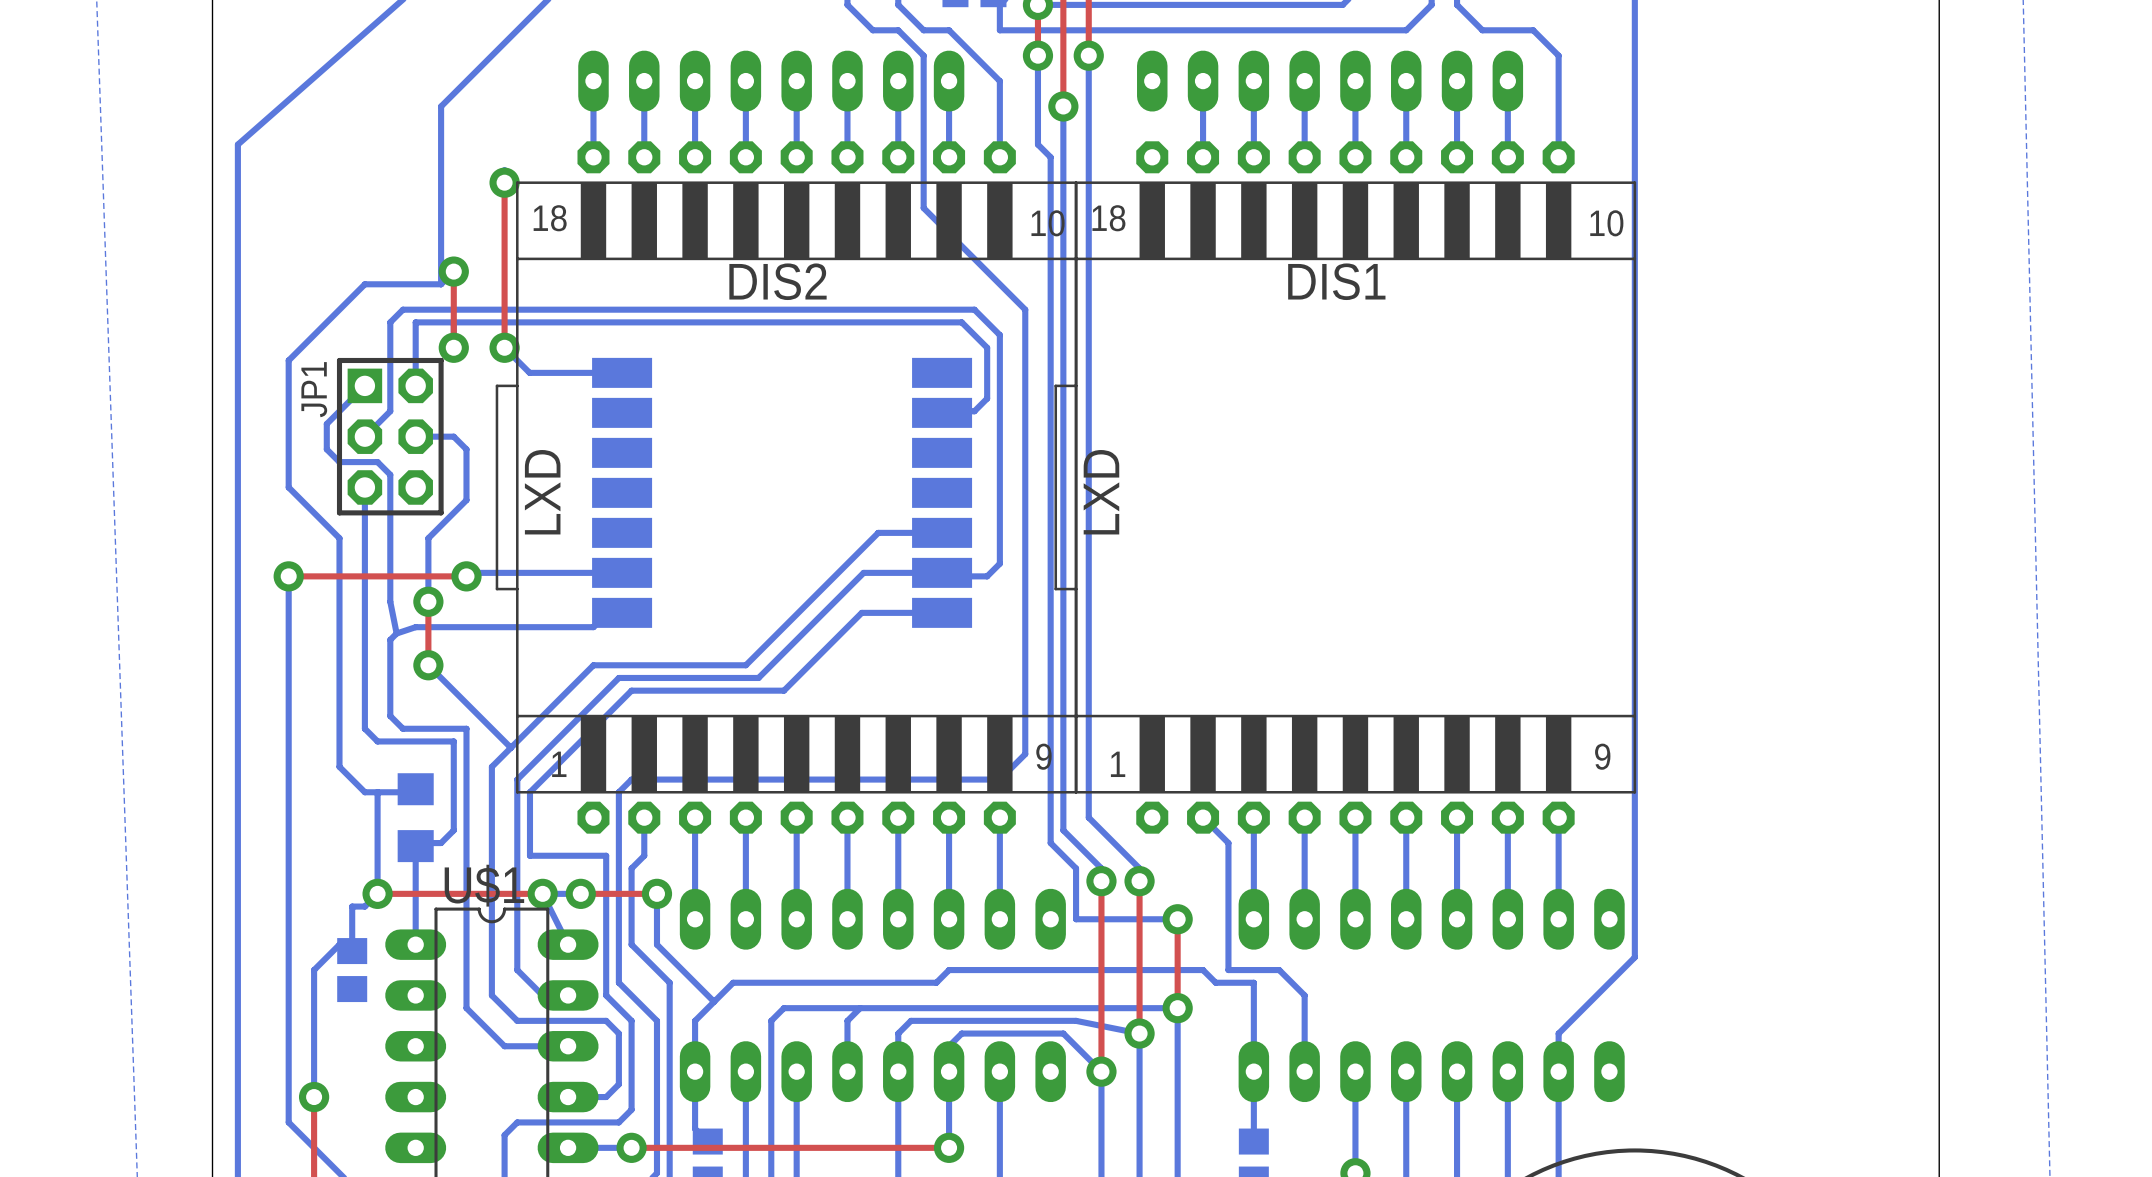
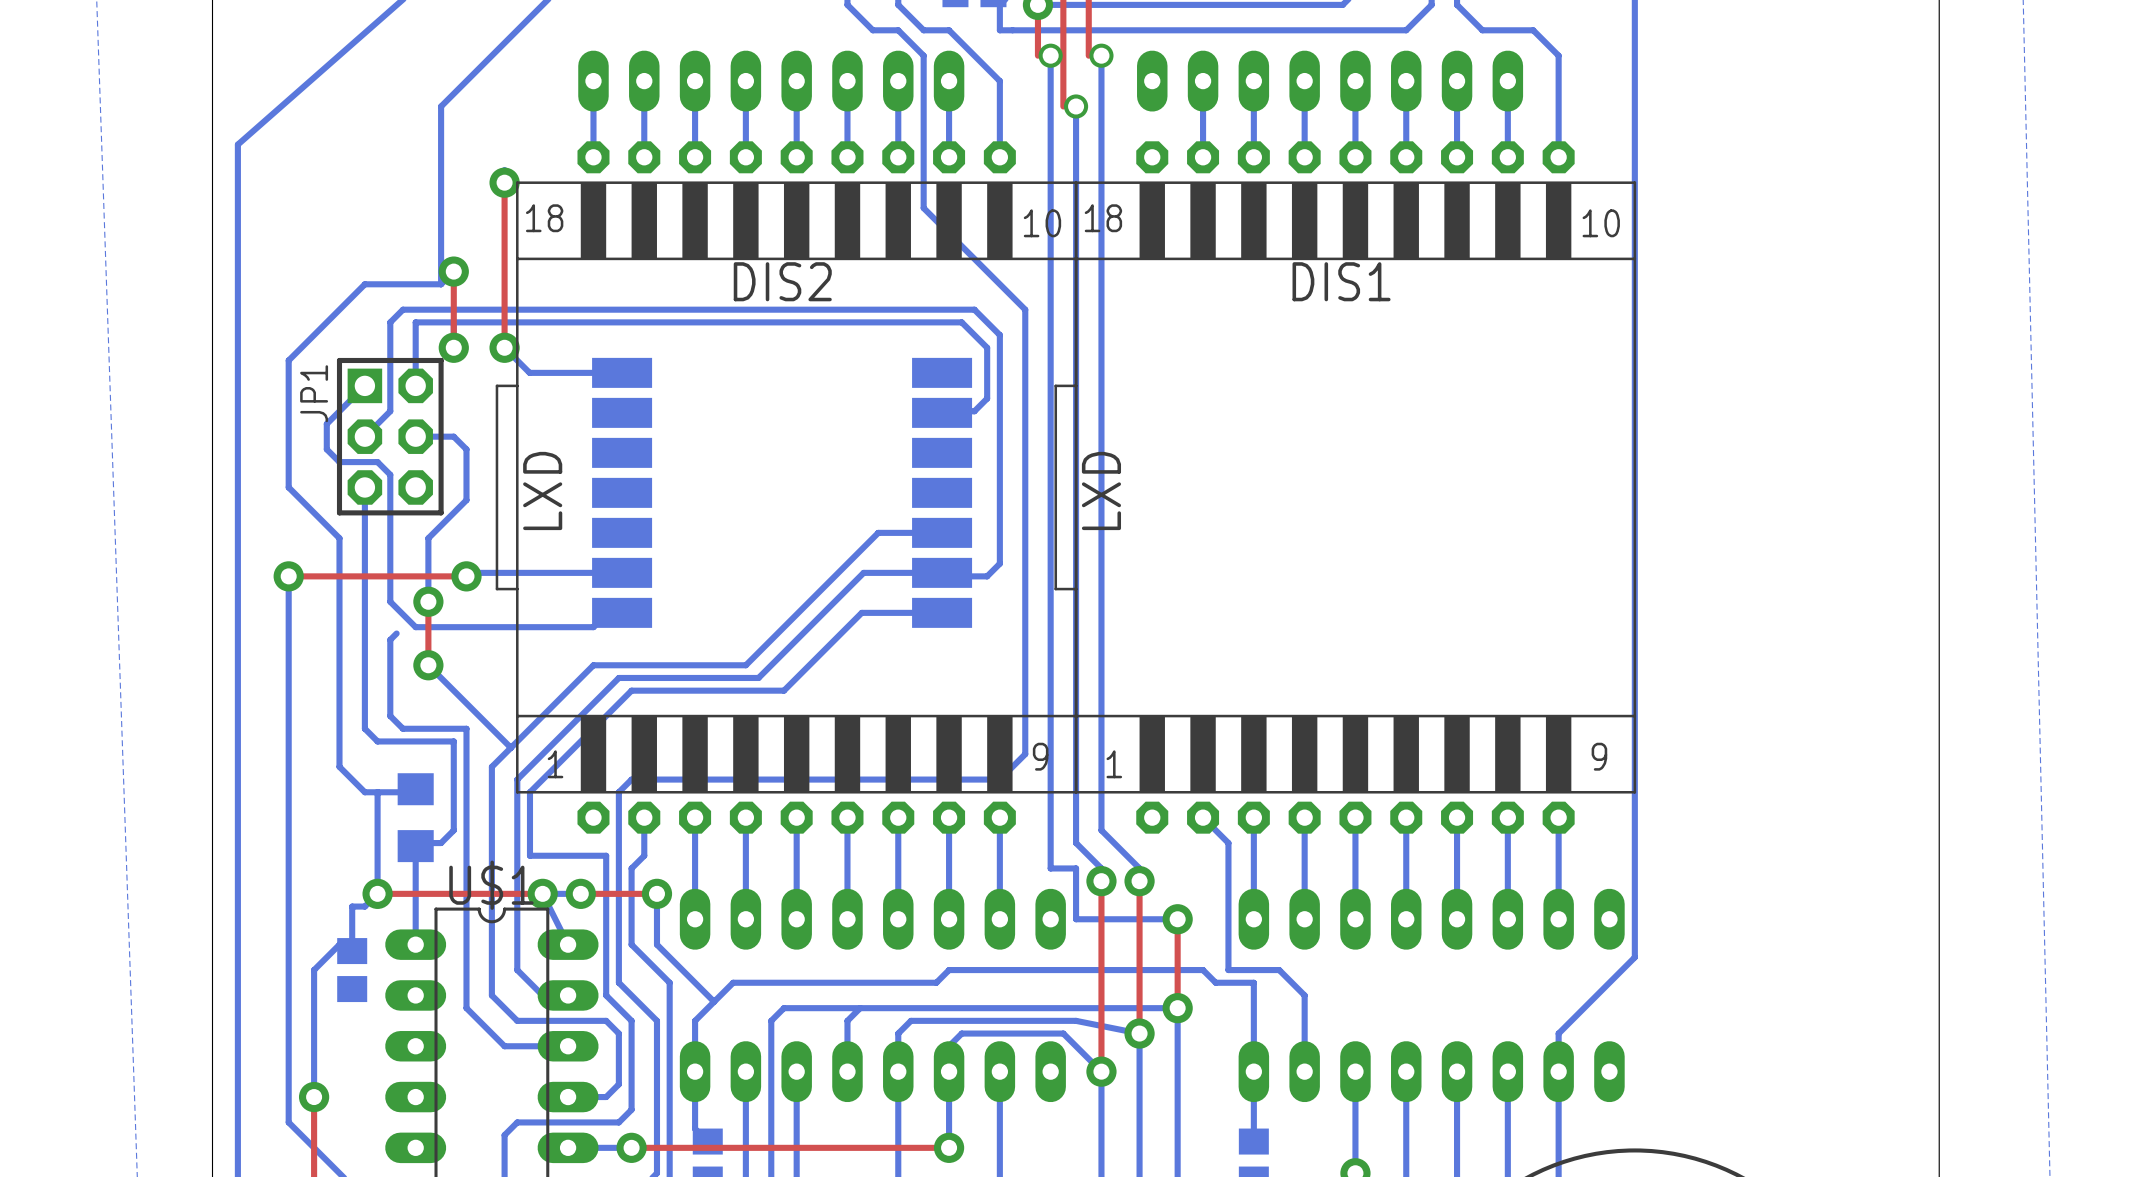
bottom track: (1037, 55) (1037, 144) (1050, 157) -> (1050, 55) (1050, 157)
via position: (1037, 55) -> (1050, 55)
bottom track: (1088, 55) (1088, 817) (1101, 830) -> (1101, 55) (1101, 830)
via position: (1088, 55) -> (1101, 55)
bottom track: (1063, 106) (1063, 830) (1076, 843) -> (1076, 106) (1076, 843)
via position: (1063, 106) -> (1076, 106)
bottom track: (390, 601) (396, 633) (415, 627) -> (390, 601) (415, 627)
bottom track: (1050, 843) (1076, 868) -> (1050, 843) (1050, 868) (1076, 868)

